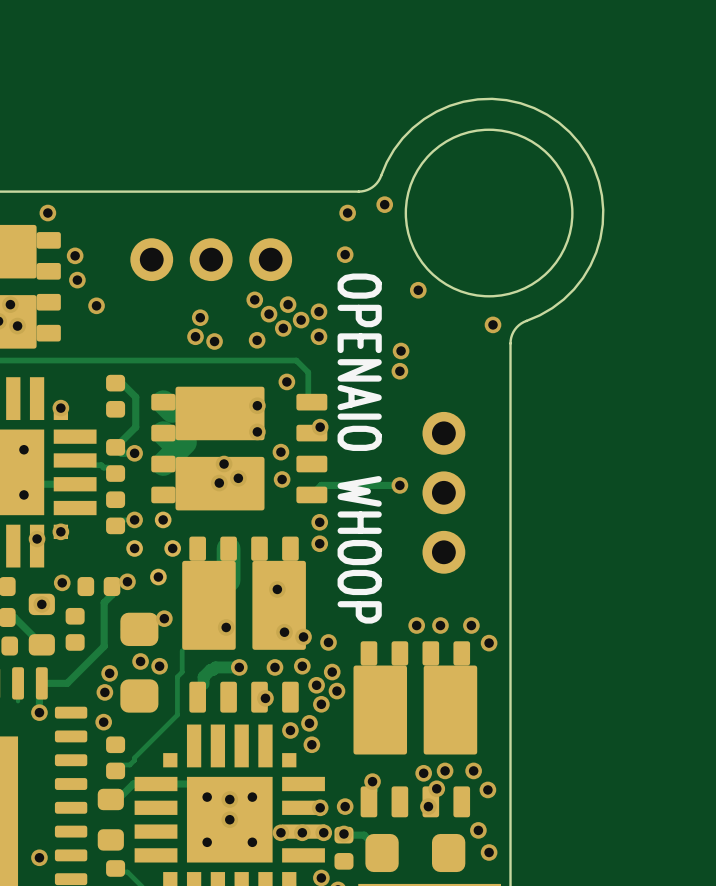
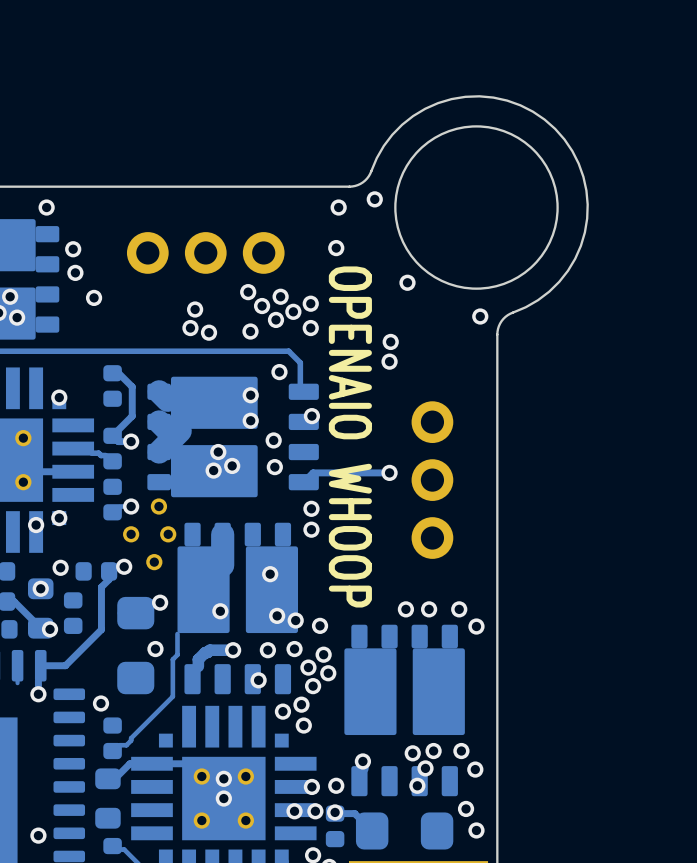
via: none -> (50, 629)
via: (140, 661) -> none
via: (109, 673) -> none
via: (104, 692) -> none
via: (280, 832) -> none

